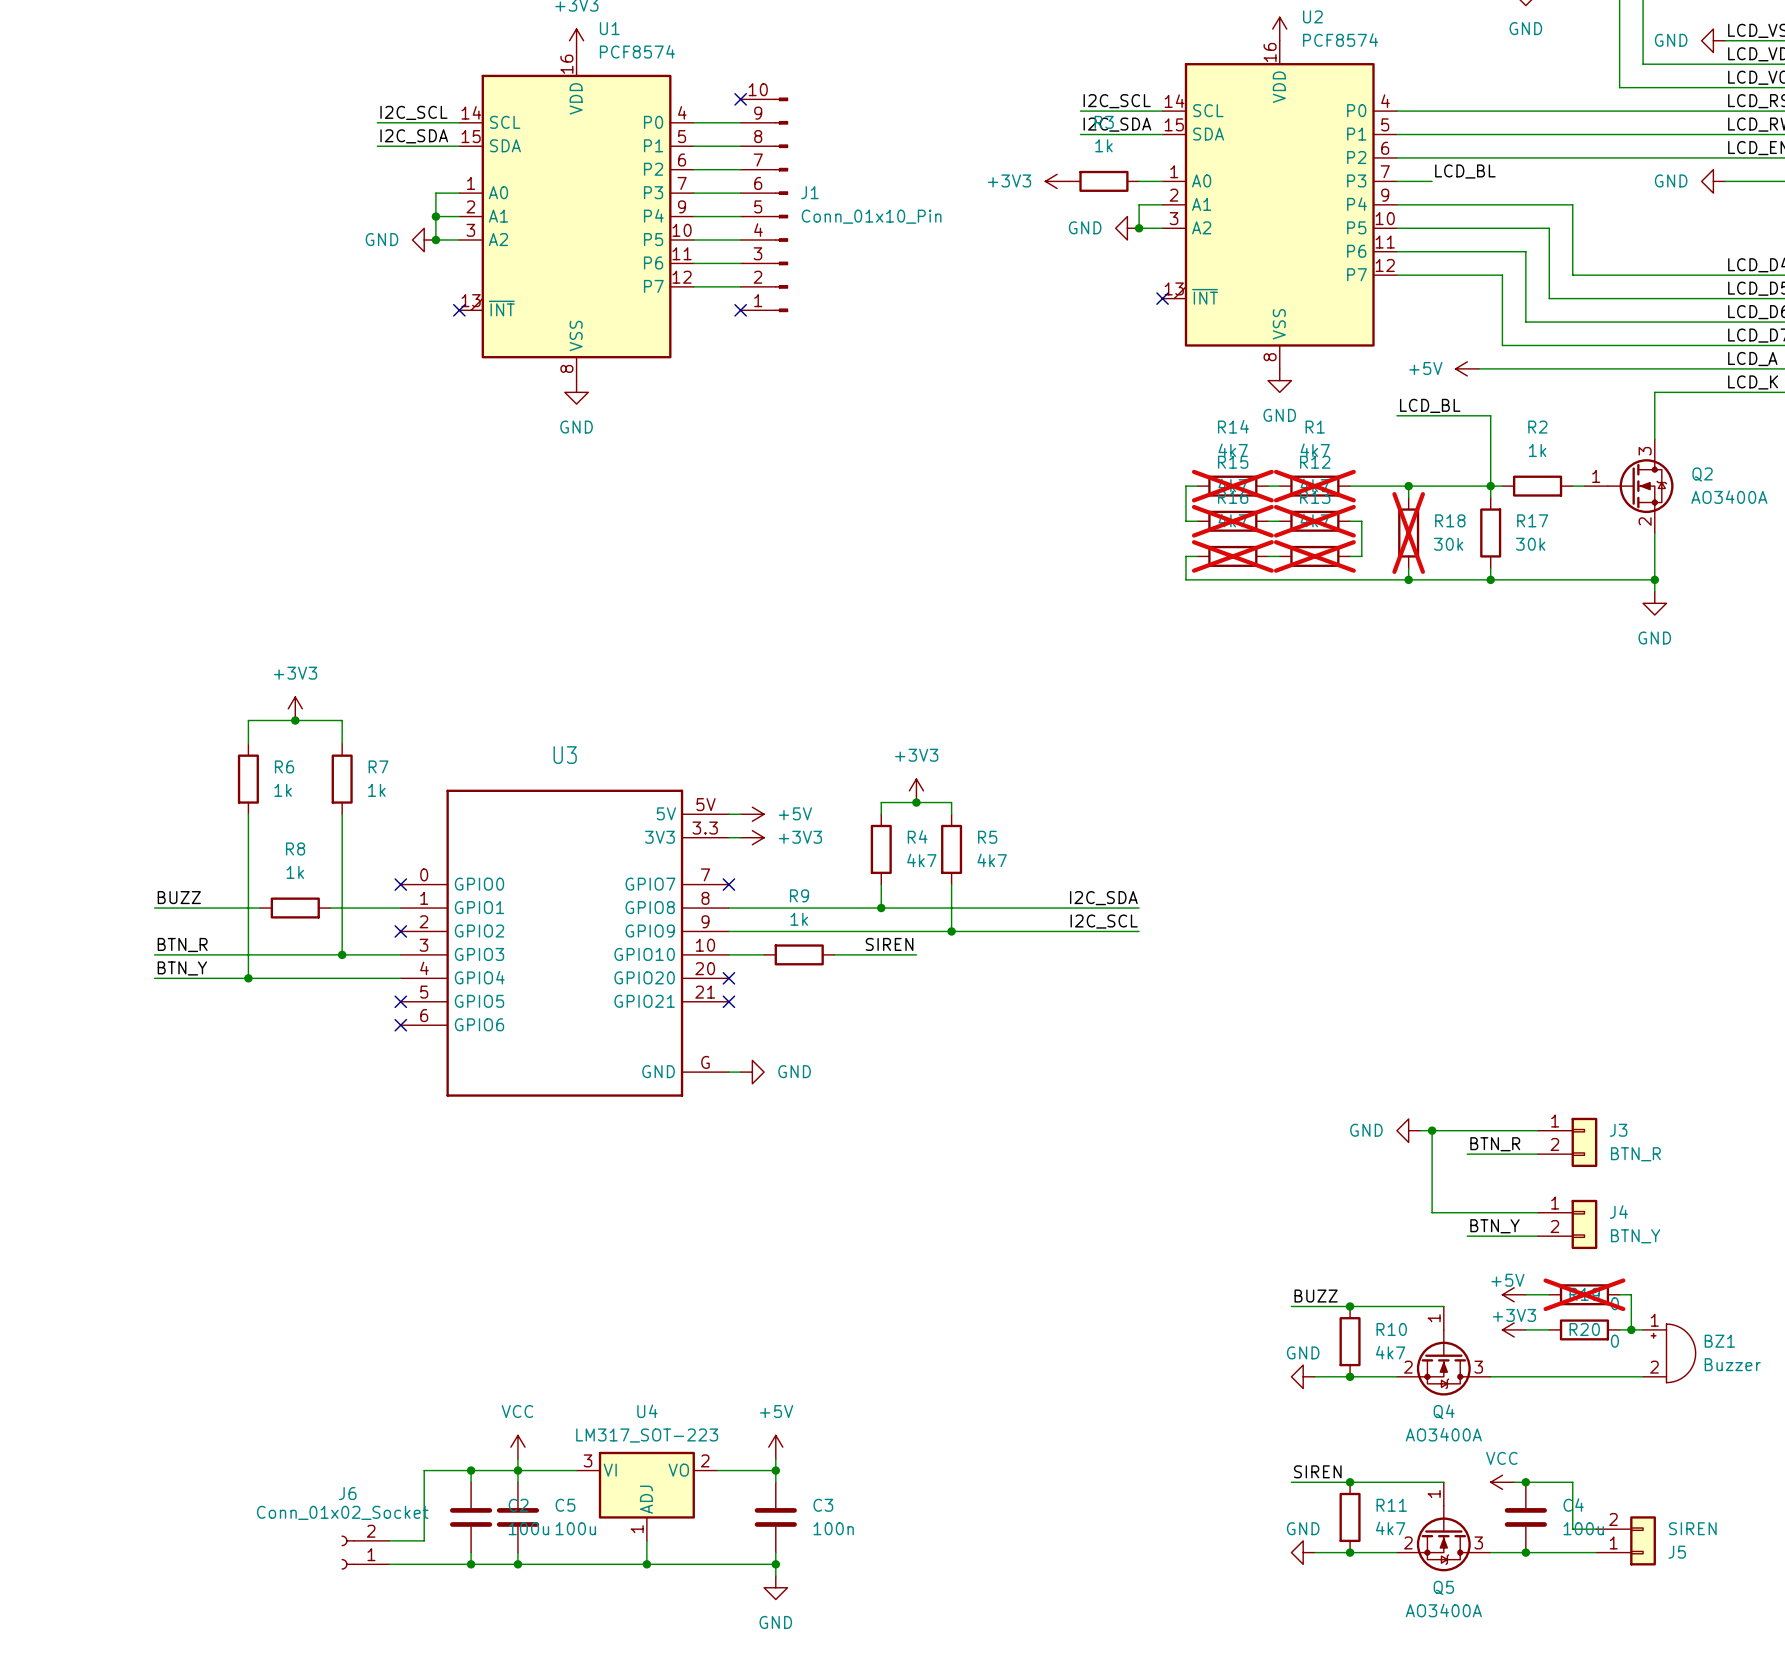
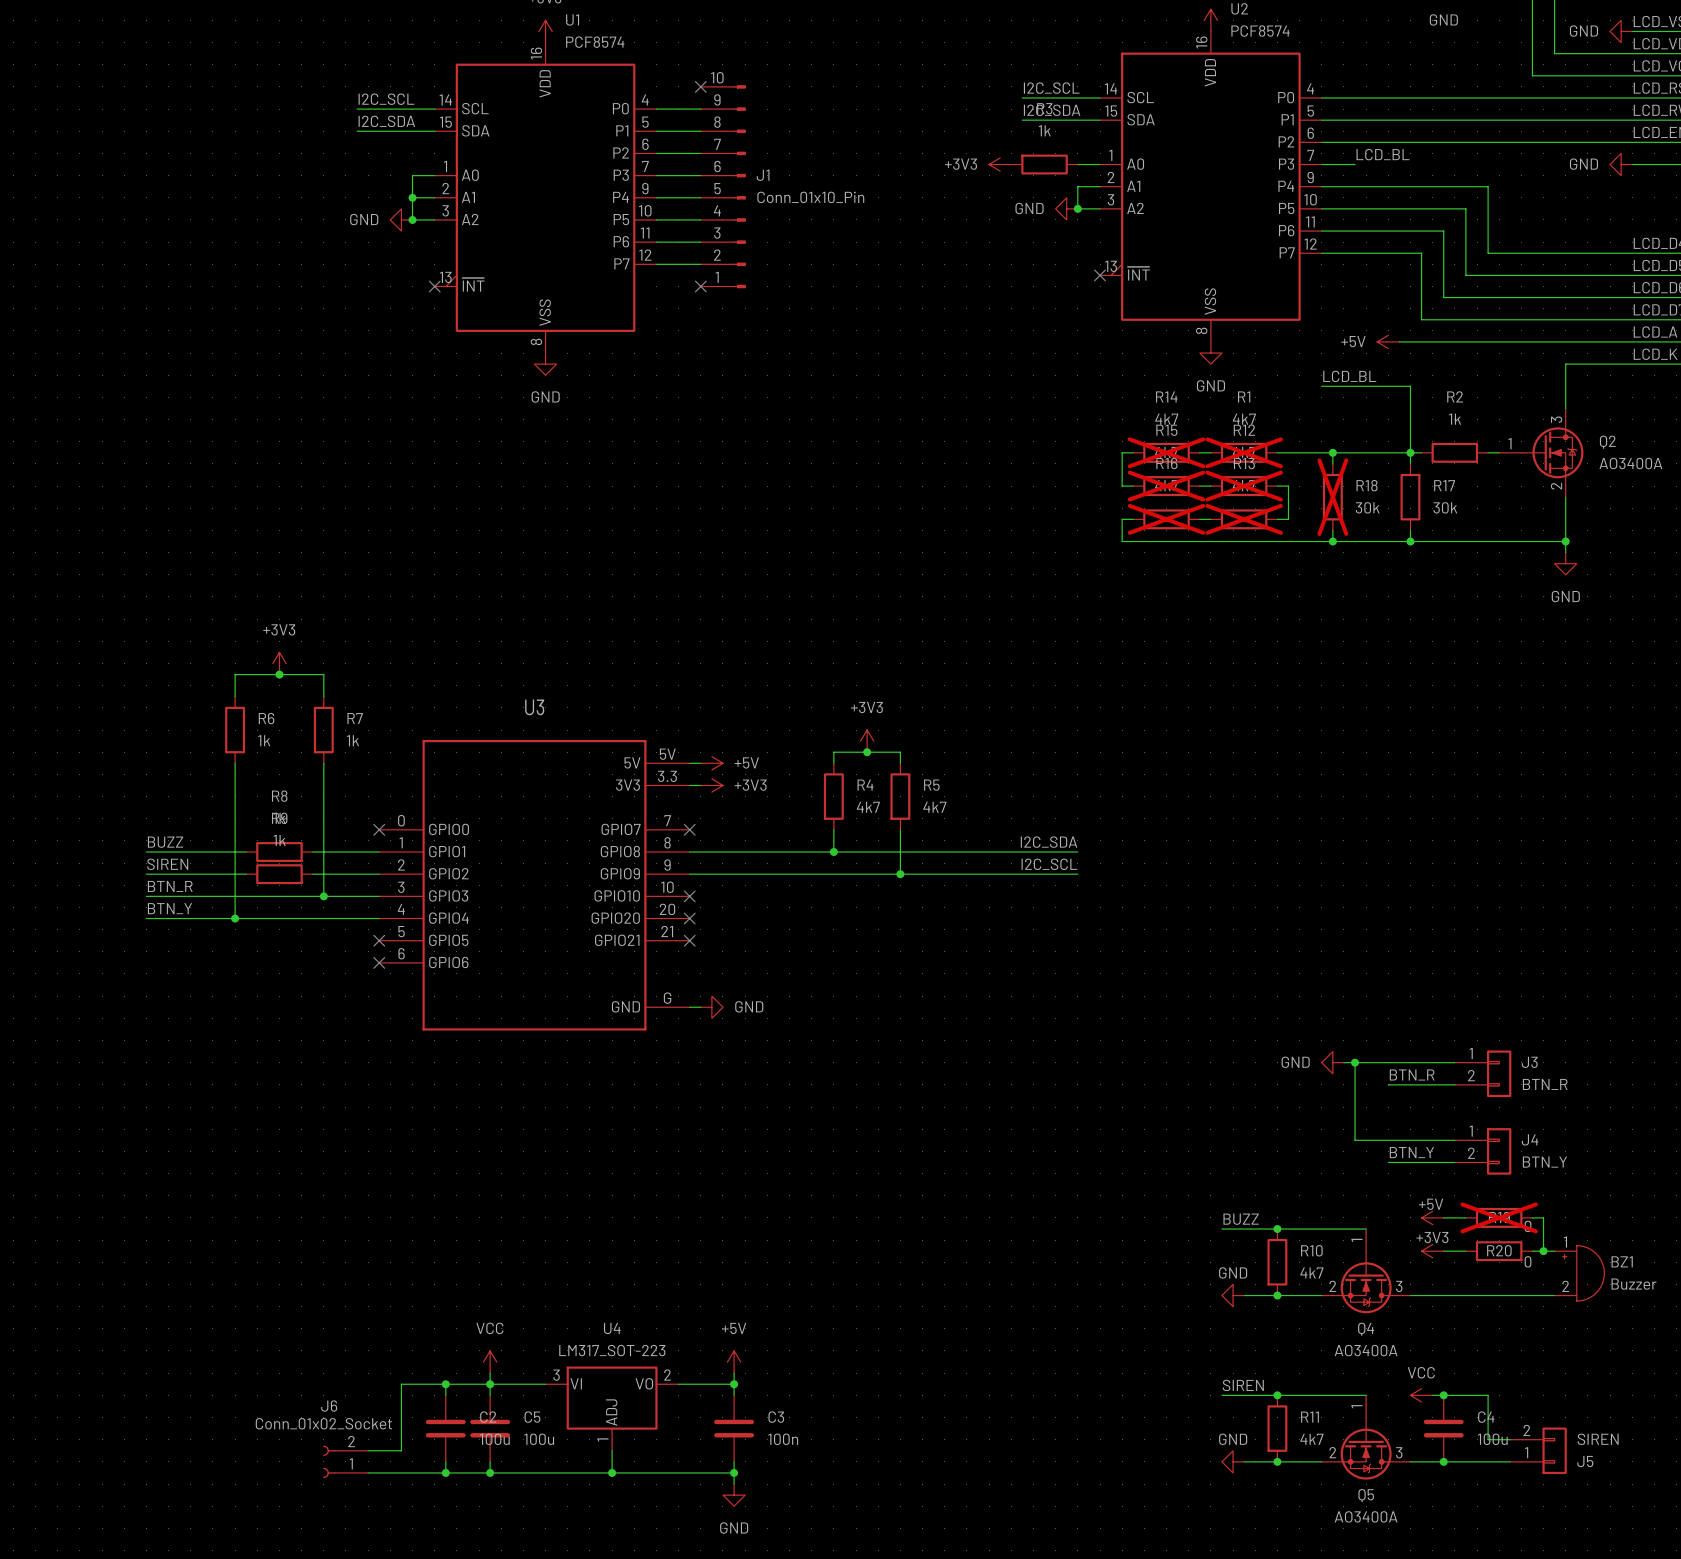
label: none -> SIREN (167, 864)
wire: none -> (146, 874) (246, 874)
wire: none -> (312, 874) (379, 874)
no-connect mark: (400, 931) -> none
label: SIREN (889, 944) -> none
wire: (728, 954) (764, 954) -> none
no-connect mark: none -> (689, 896)
R9 position: (799, 954) -> (279, 874)
wire: (834, 954) (916, 954) -> none

